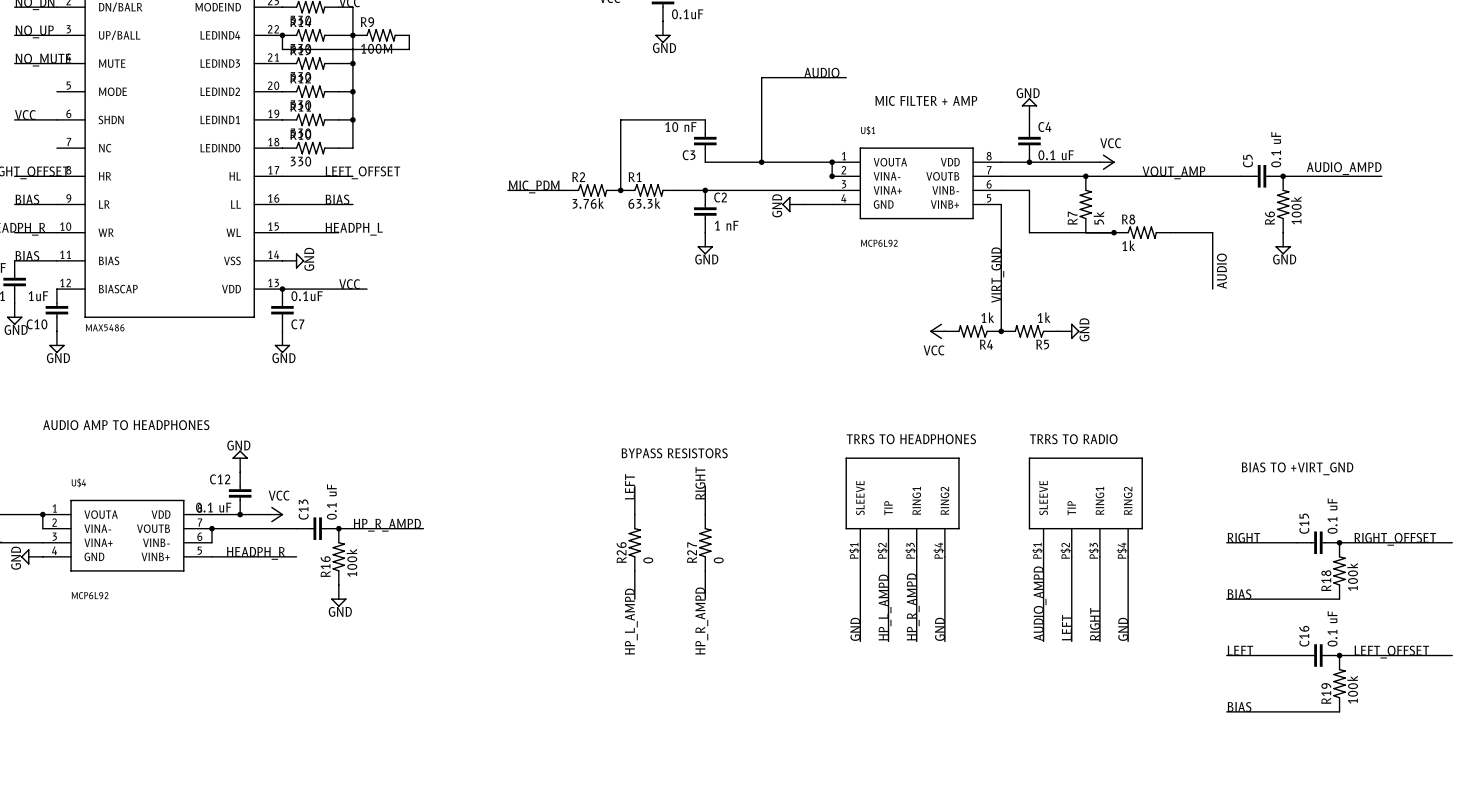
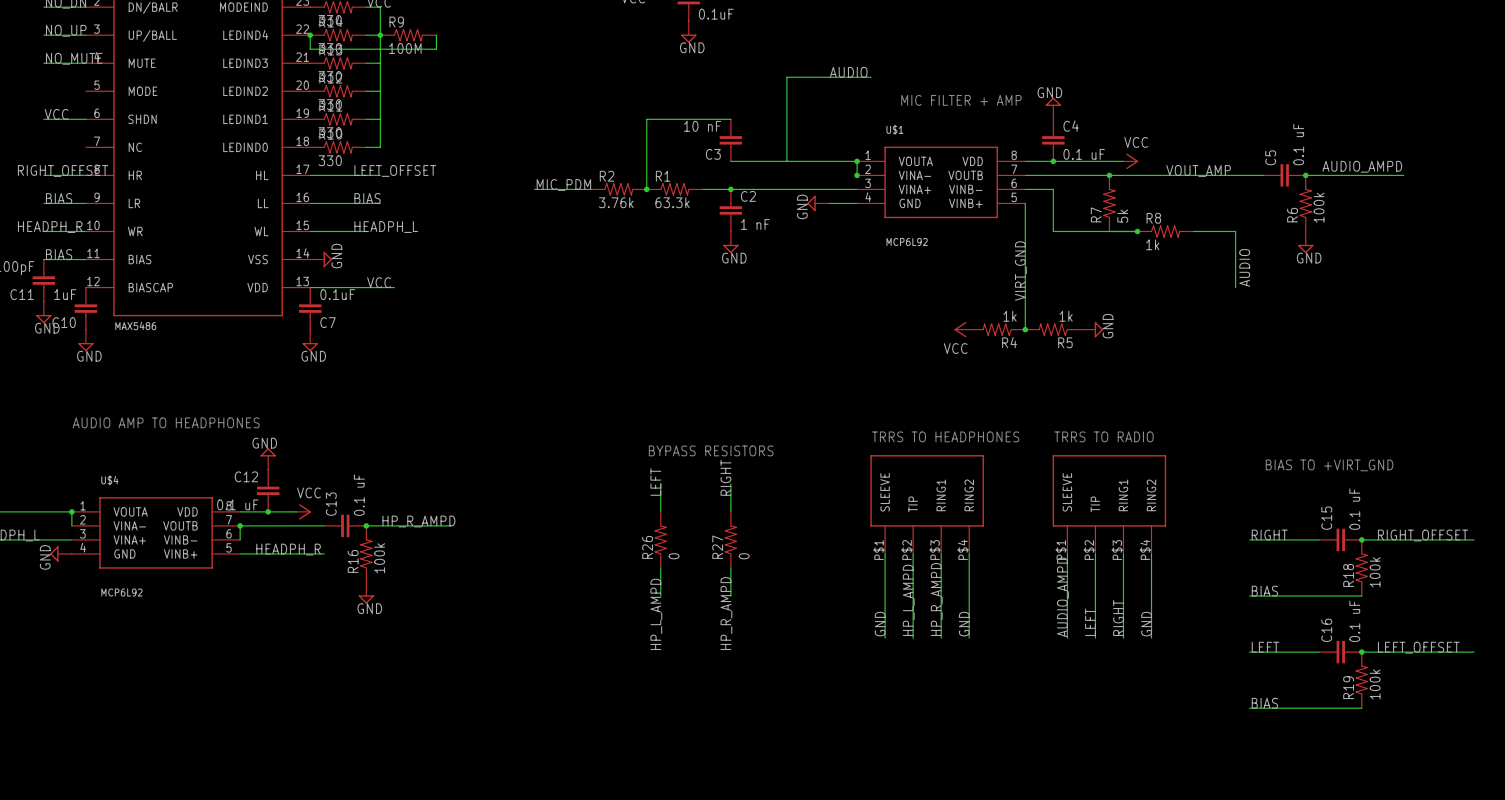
junction: (352, 63) -> none
junction: (352, 91) -> none
junction: (352, 119) -> none
junction: (761, 162) -> none
junction: (282, 289) -> none

